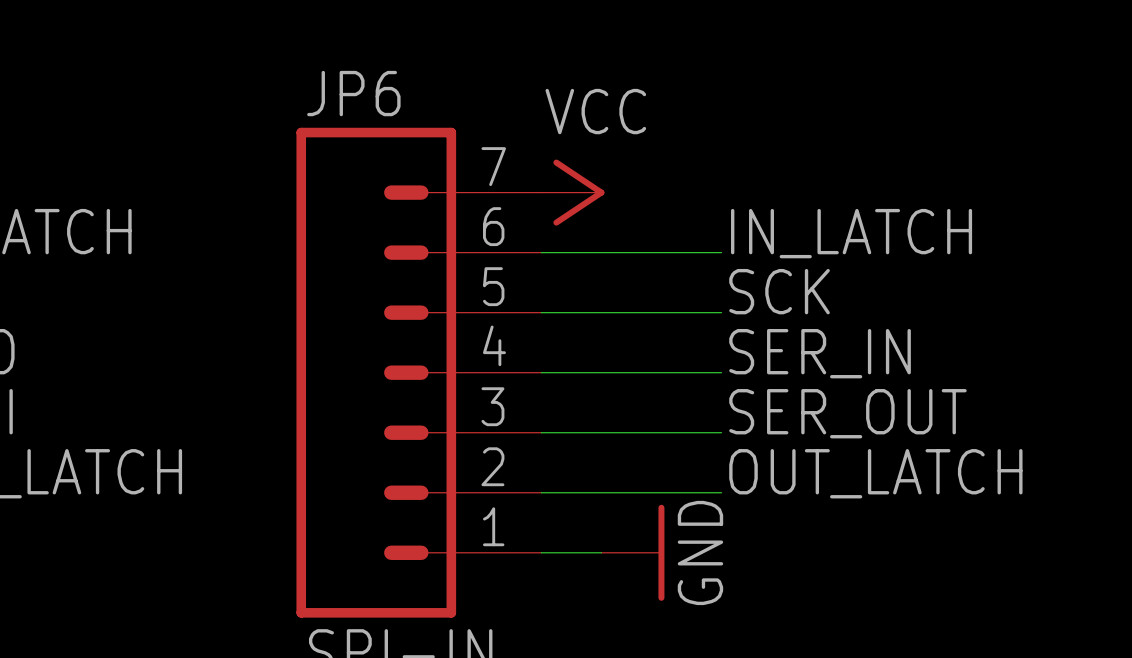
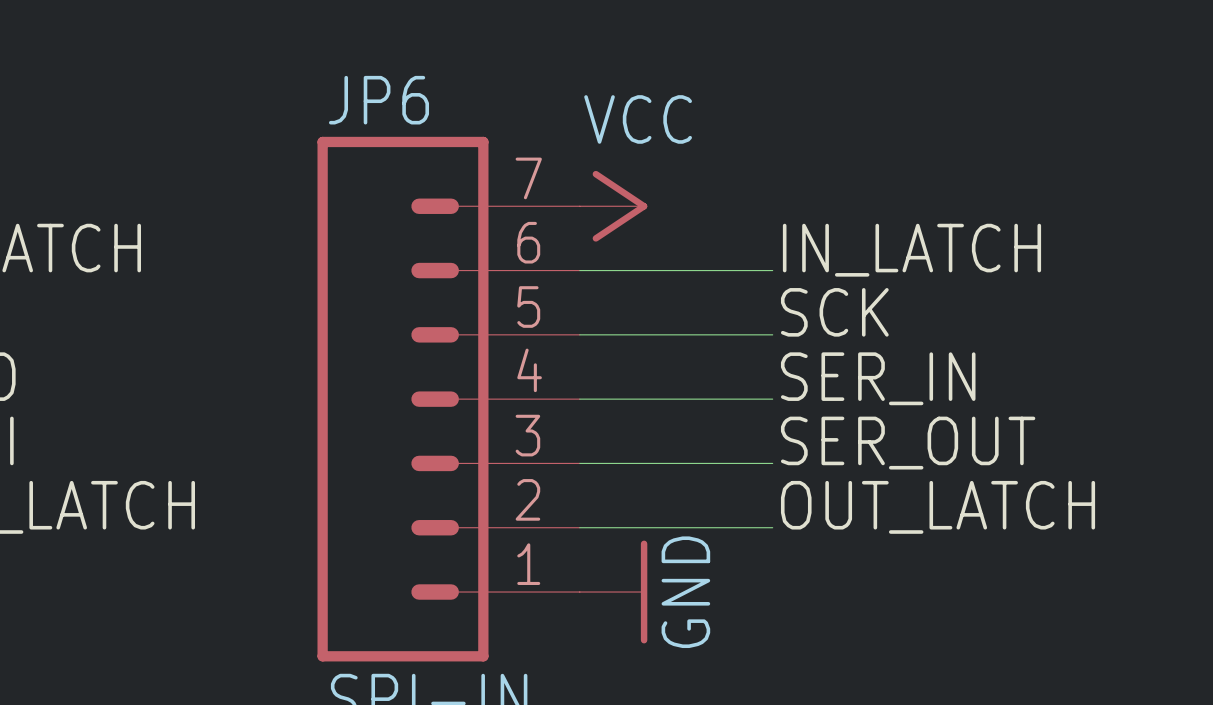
power symbol position: GND (632, 552) -> GND (613, 592)

